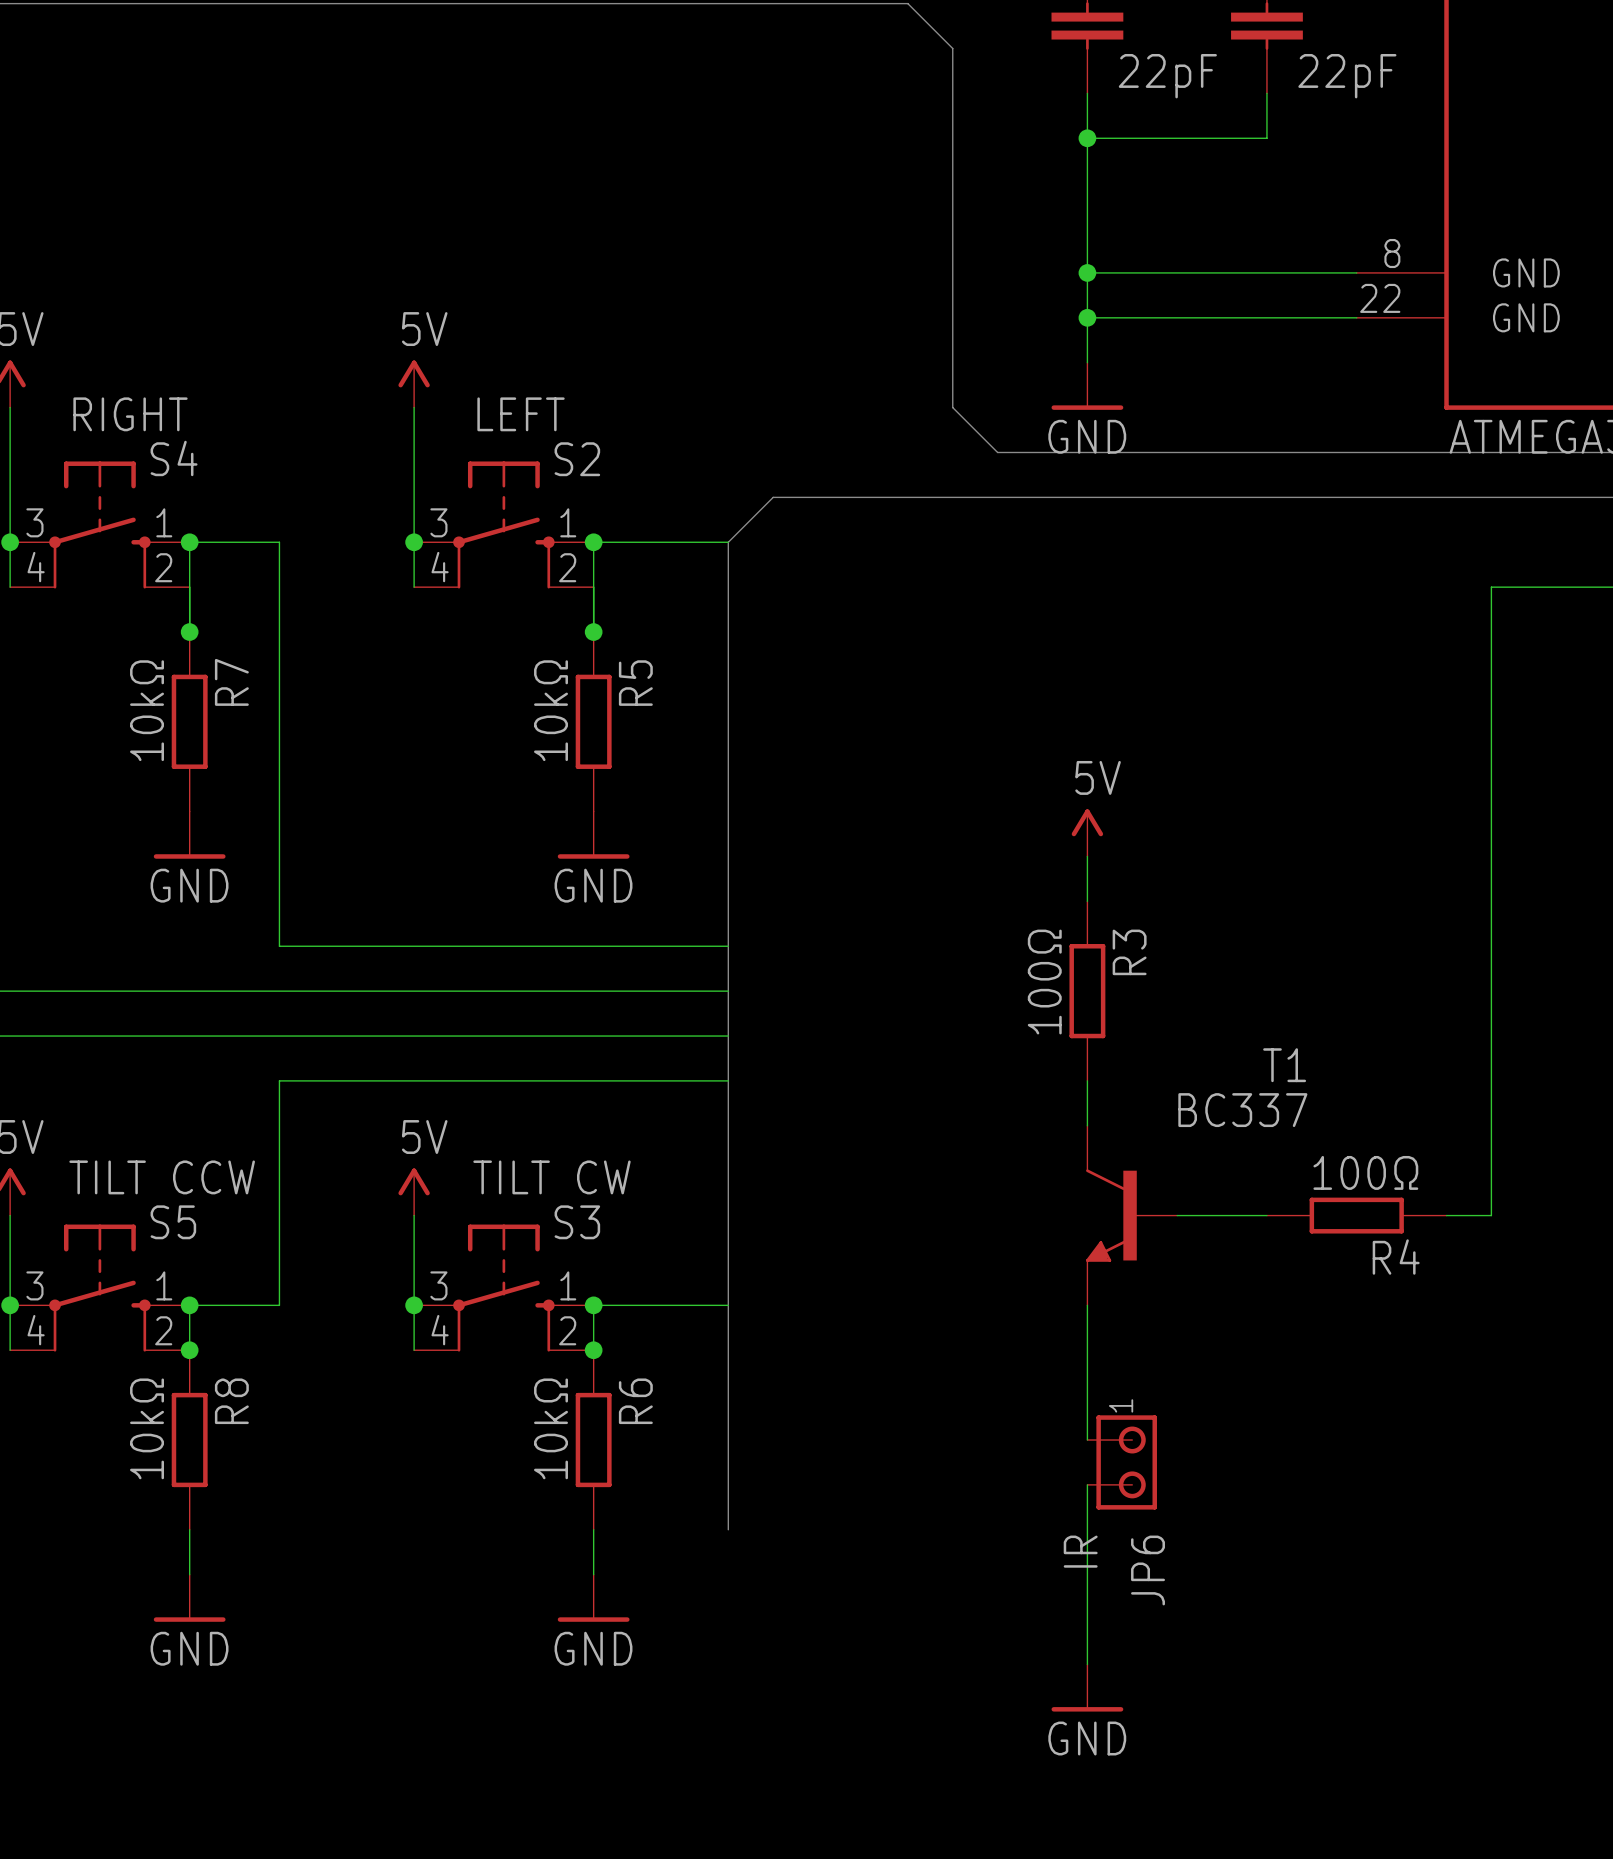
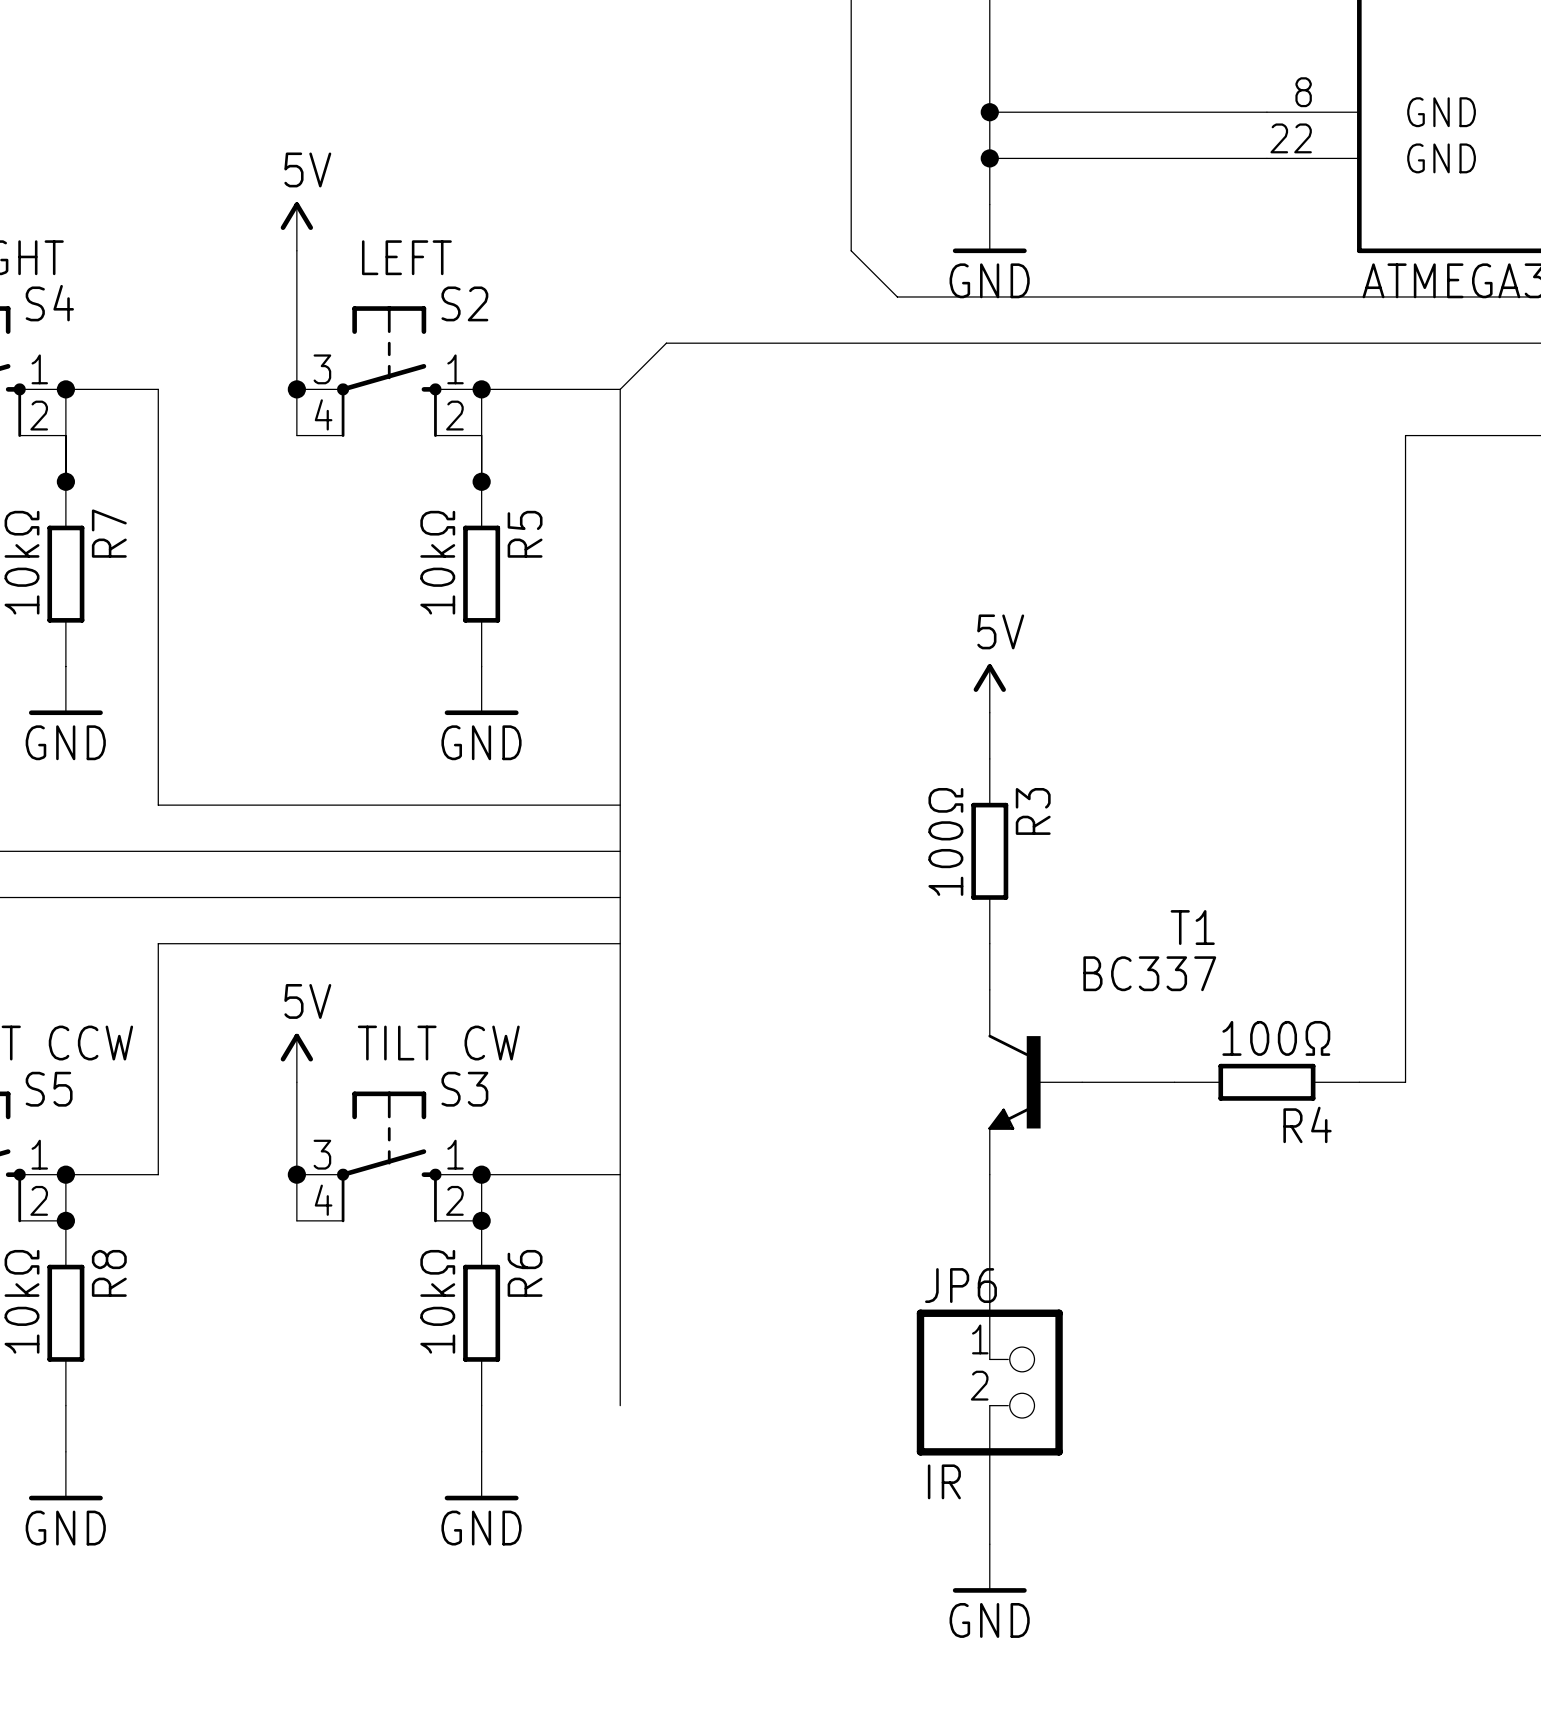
JP6 symbol: [1087, 1415, 1157, 1510] -> [916, 1309, 1063, 1456]
wire: (1087, 1484) (1087, 1529) -> (989, 1359) (989, 1313)
JP6 name position: JP6 (1148, 1570) -> JP6 (961, 1285)

